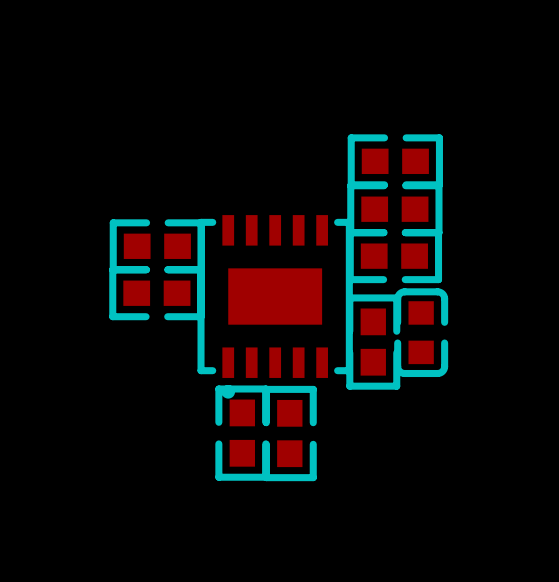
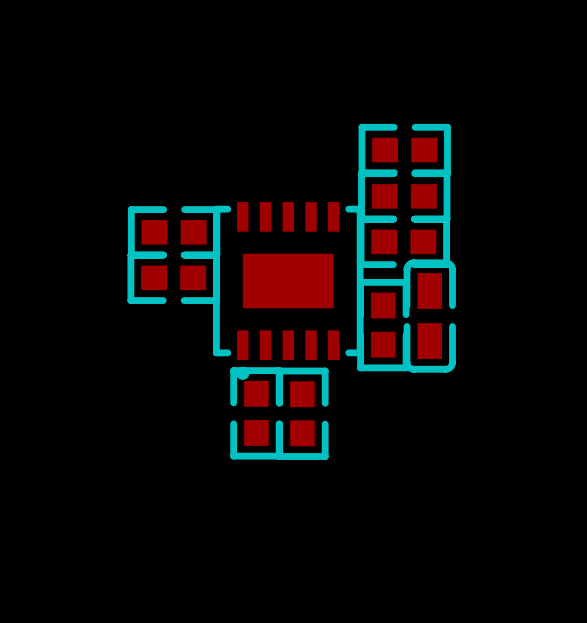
part footprint: [394, 288, 449, 378] -> [403, 259, 456, 373]

